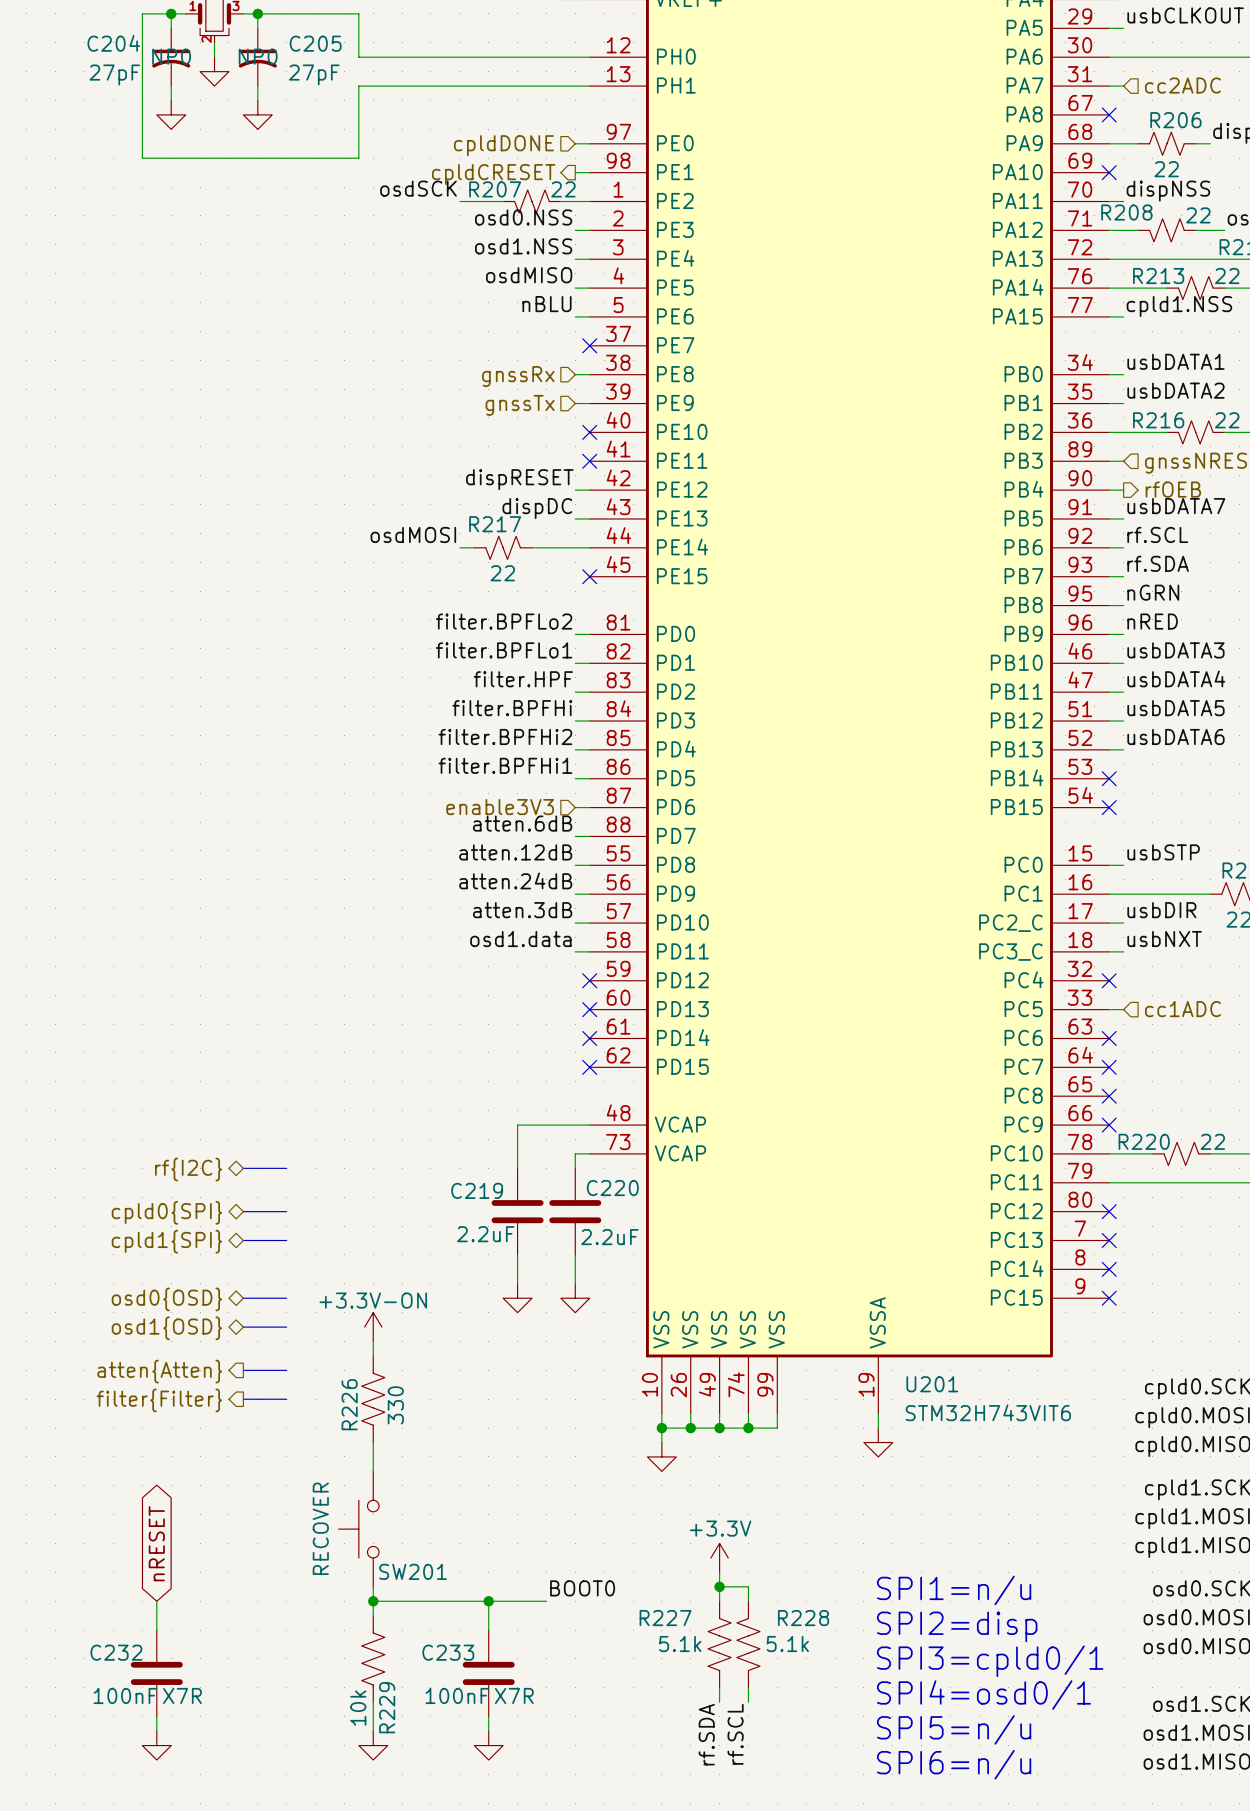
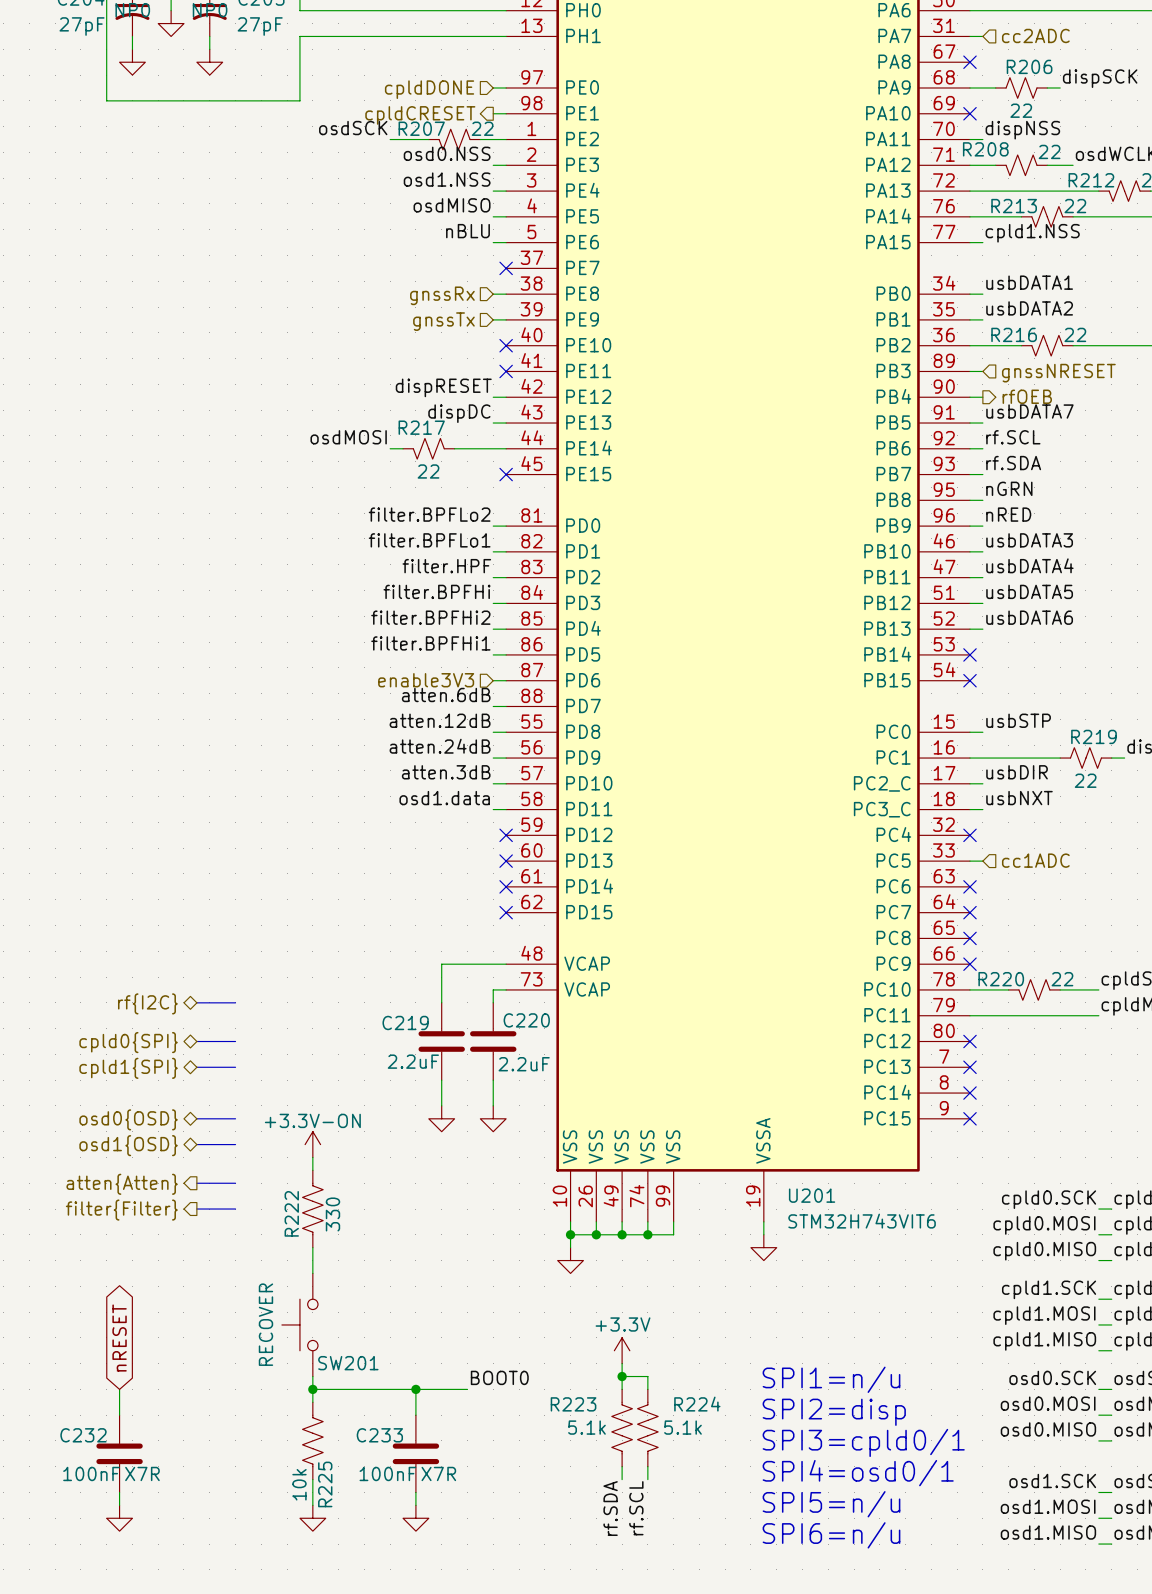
R226 name: R226 (349, 1404) -> R222 (291, 1213)
R227 name: R227 (665, 1618) -> R223 (573, 1404)
R228 name: R228 (803, 1618) -> R224 (697, 1404)
R229 name: R229 (387, 1707) -> R225 (325, 1484)

